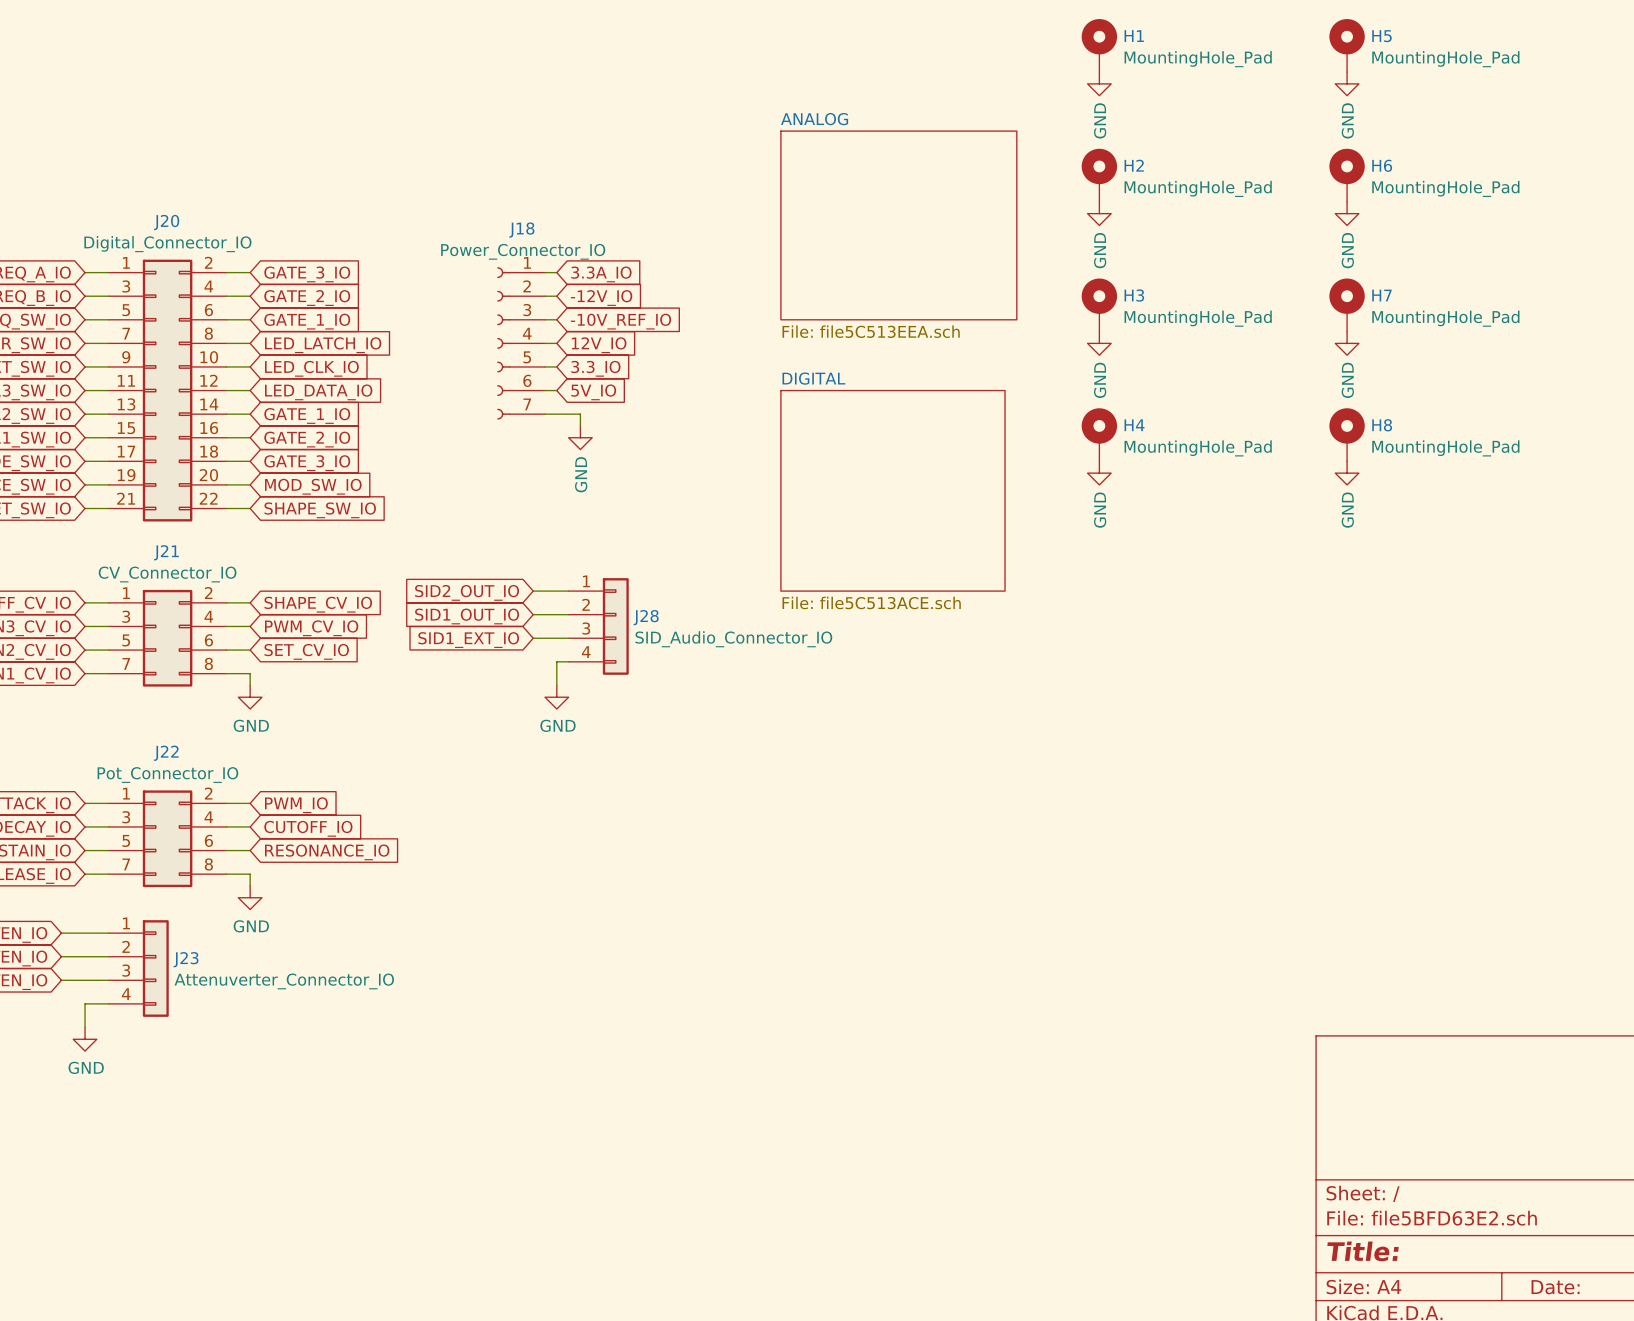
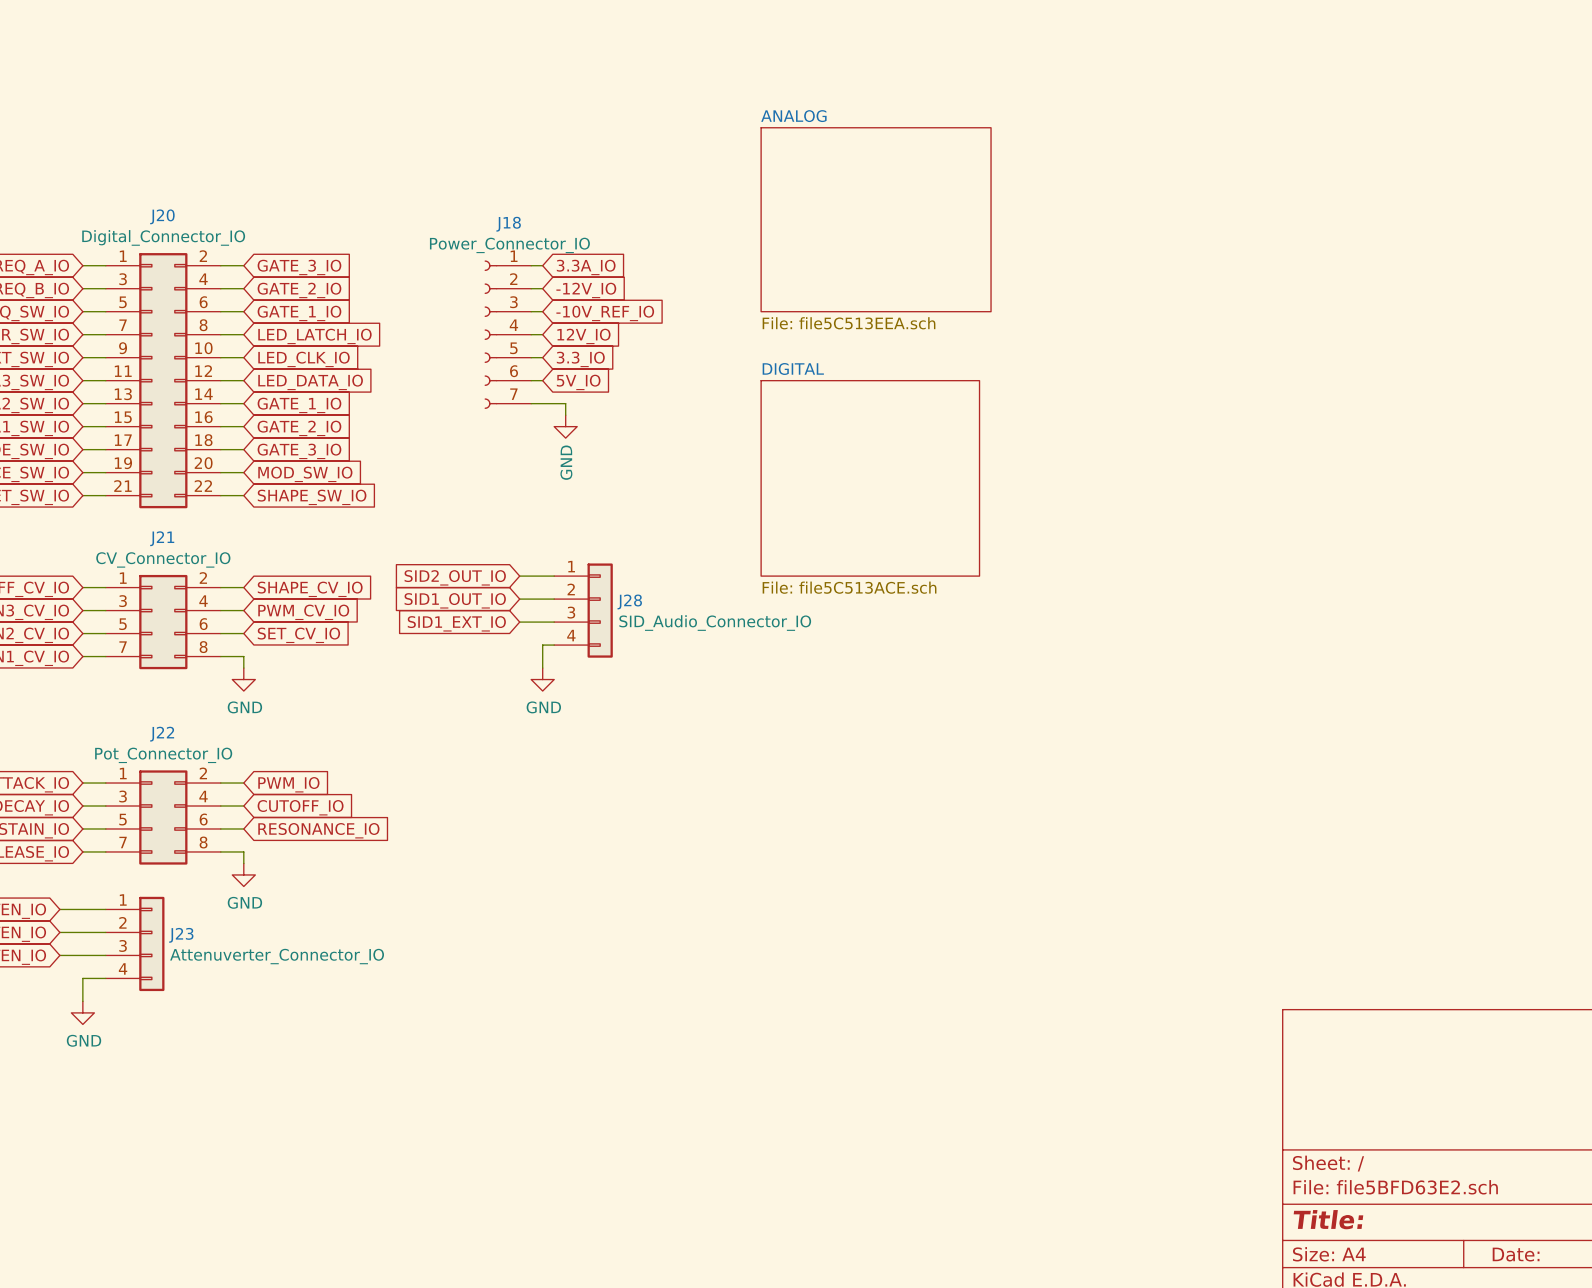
H1: MountingHole_Pad (1099, 45) -> none
H5: MountingHole_Pad (1347, 45) -> none
power symbol: GND (1099, 83) -> none
power symbol: GND (1347, 83) -> none
H2: MountingHole_Pad (1099, 175) -> none
H6: MountingHole_Pad (1347, 175) -> none
power symbol: GND (1099, 213) -> none
power symbol: GND (1347, 213) -> none
H3: MountingHole_Pad (1099, 305) -> none
H7: MountingHole_Pad (1347, 305) -> none
power symbol: GND (1099, 343) -> none
power symbol: GND (1347, 343) -> none
H4: MountingHole_Pad (1099, 434) -> none
H8: MountingHole_Pad (1347, 434) -> none
power symbol: GND (1099, 473) -> none
power symbol: GND (1347, 473) -> none

